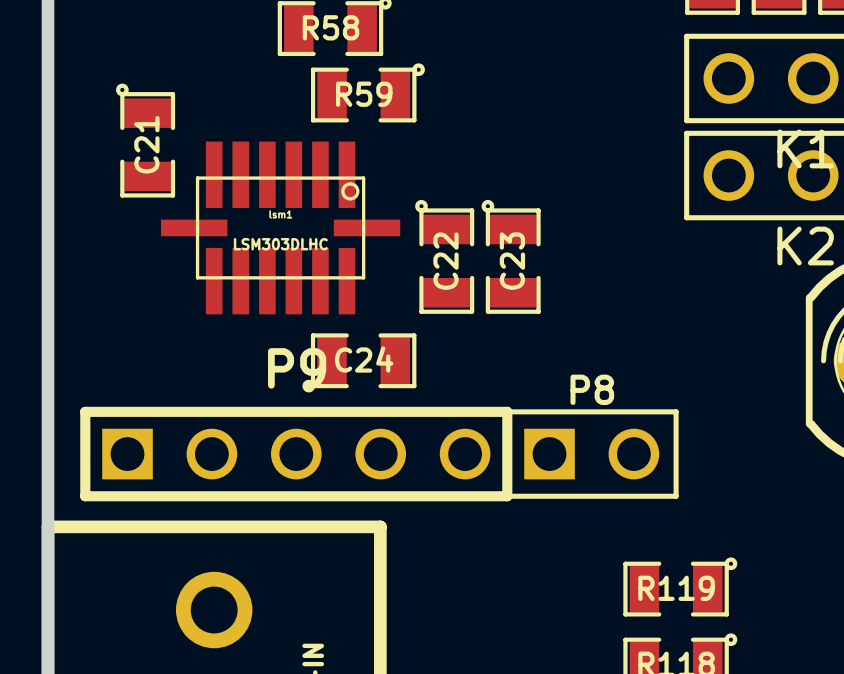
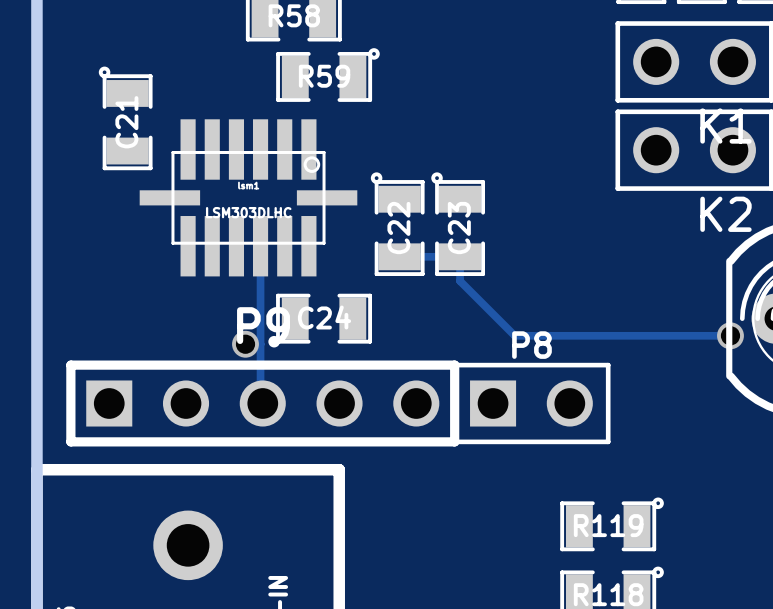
track: none -> (260, 246) (260, 401) (262, 403)
track: none -> (399, 256) (460, 256) (460, 281) (514, 335) (730, 335)
via: none -> (730, 335)
via: none -> (245, 344)

